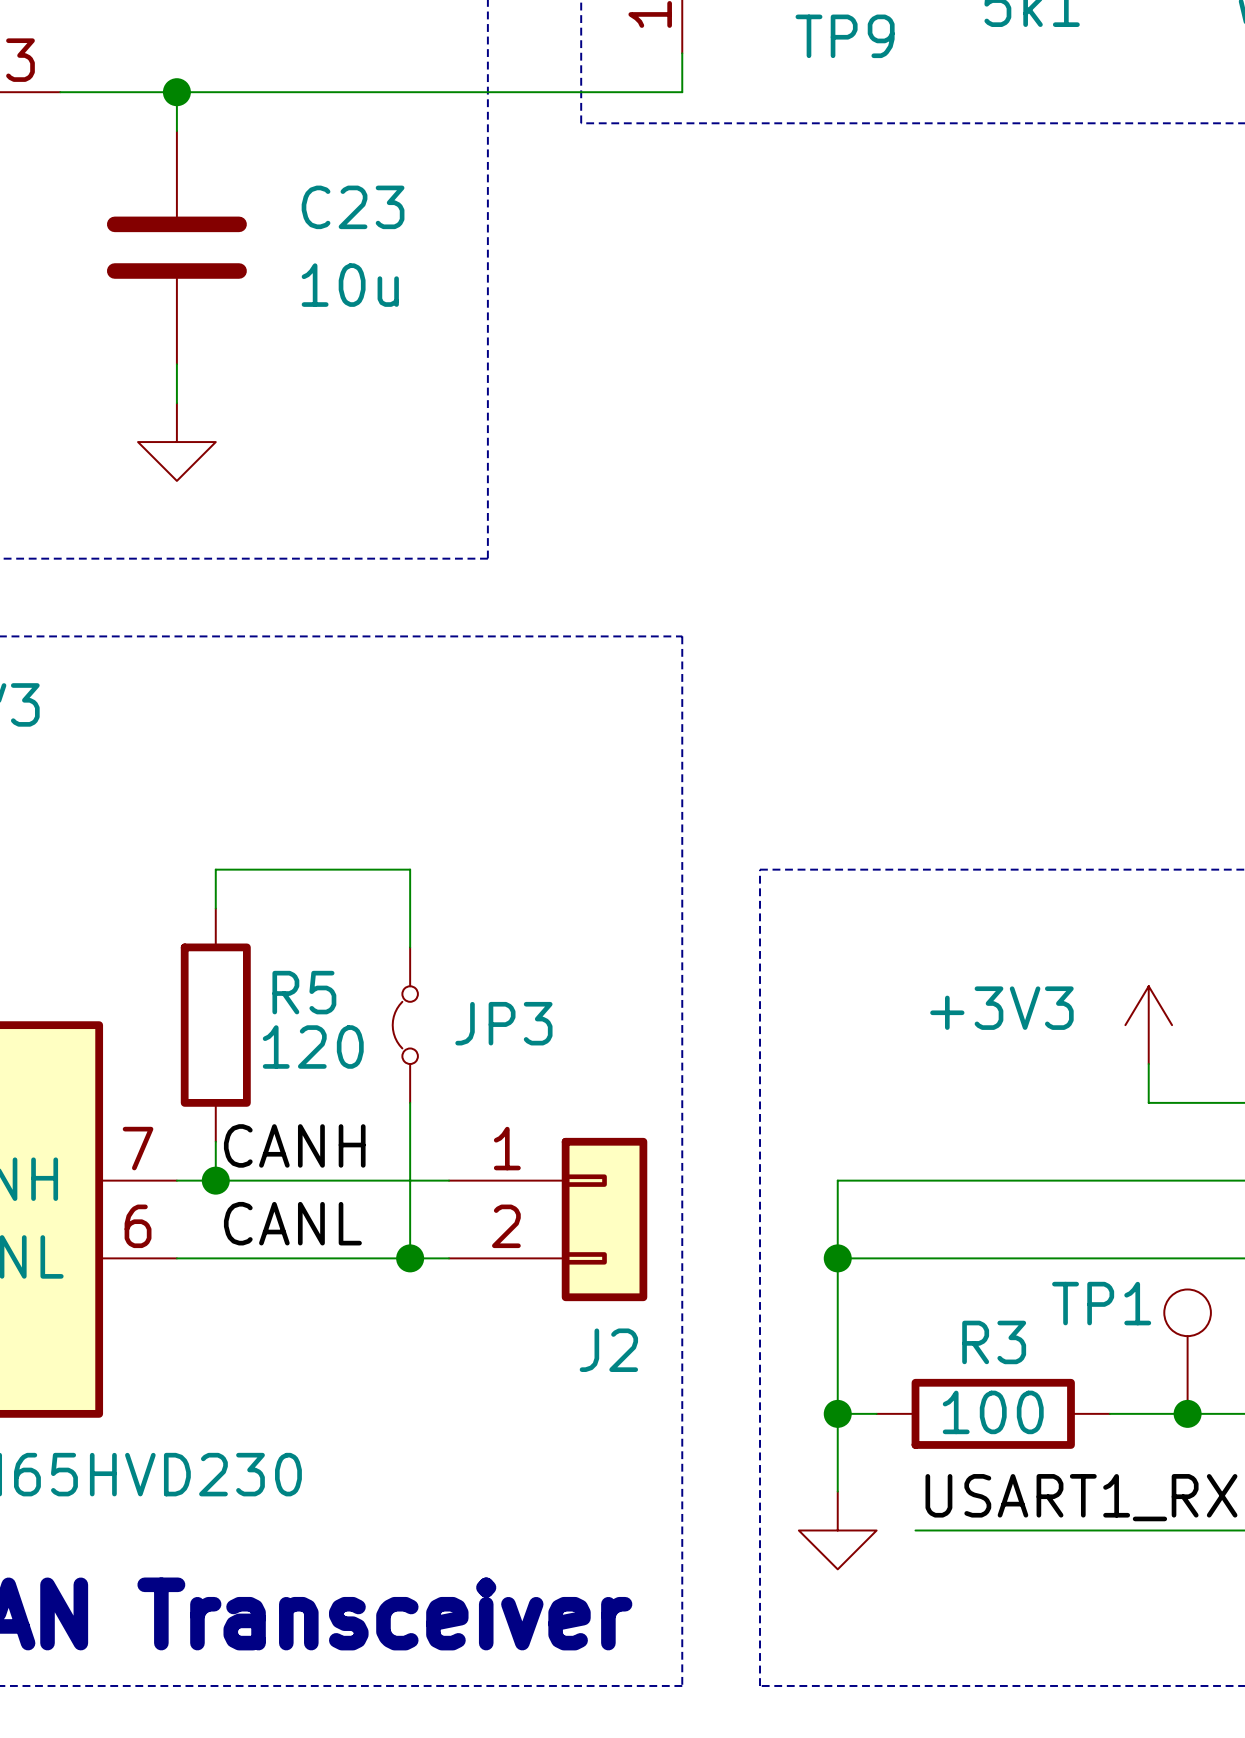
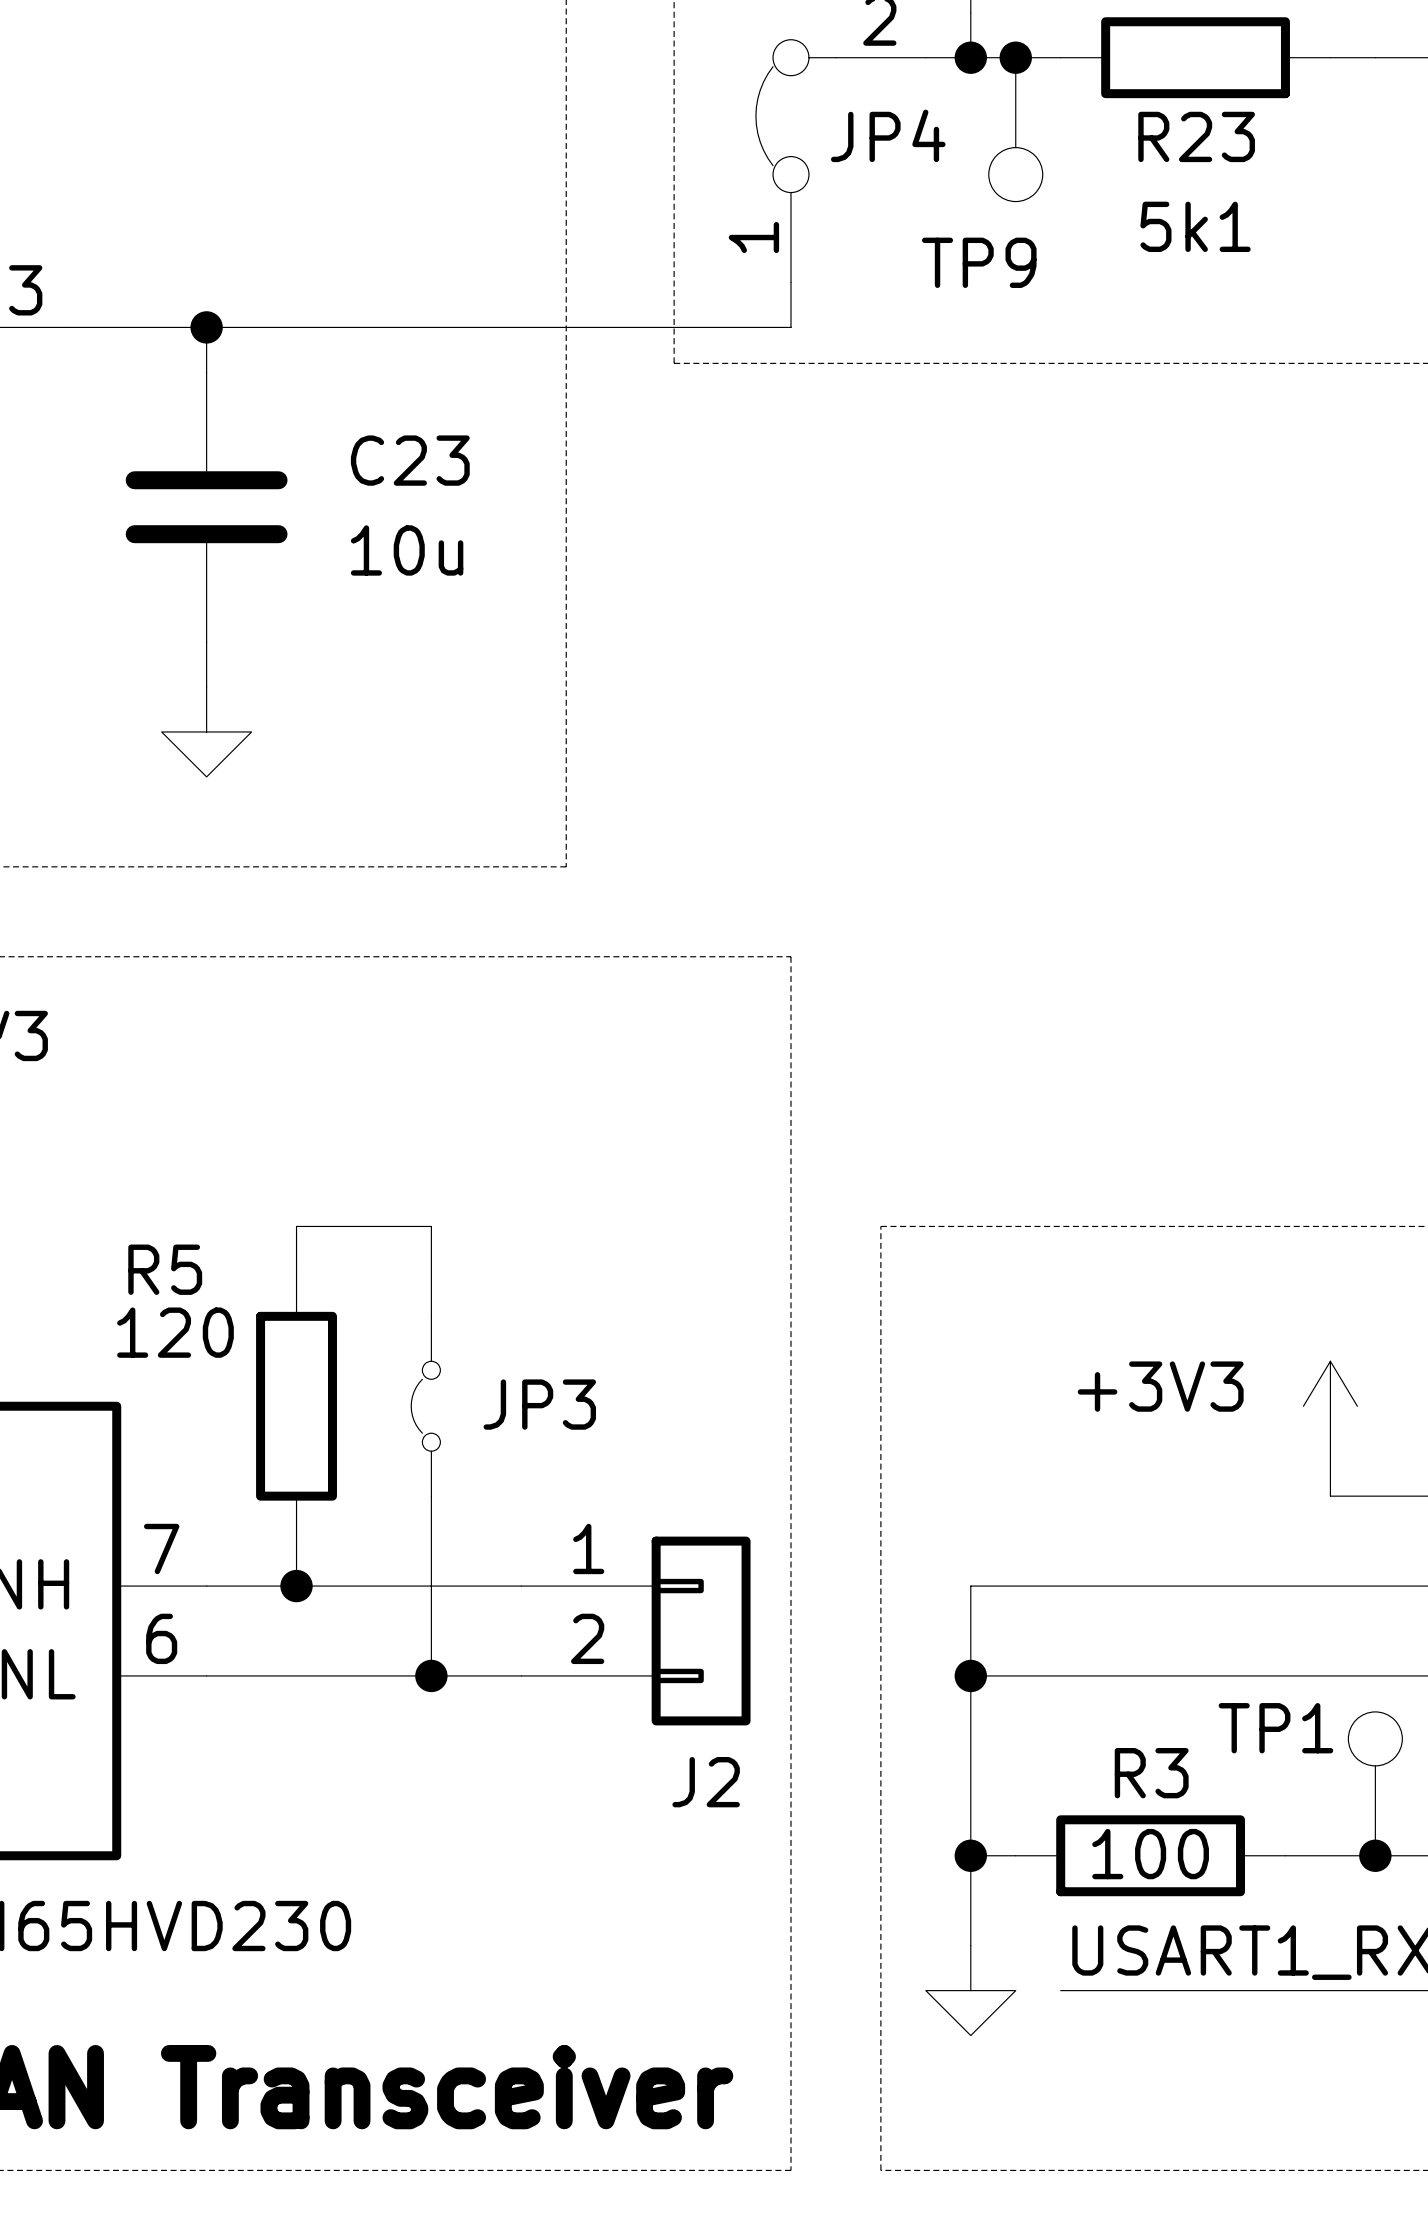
wire: (254, 869) (215, 869) (215, 908) -> (296, 1226) (296, 1271)
wire: (371, 869) (410, 869) (410, 947) -> (431, 1226) (431, 1316)
R5 name position: R5 (304, 992) -> R5 (165, 1269)
R5 position: (215, 1025) -> (296, 1406)
JP3 position: (405, 1025) -> (425, 1406)
R5 value position: 120 (313, 1047) -> 120 (175, 1332)
wire: (410, 1102) (410, 1258) -> (431, 1496) (431, 1675)
wire: (215, 1141) (215, 1180) -> (296, 1541) (296, 1586)
label: CANH (294, 1145) -> none
junction position: (215, 1180) -> (296, 1586)
label: CANL (292, 1223) -> none
junction position: (410, 1258) -> (431, 1675)

